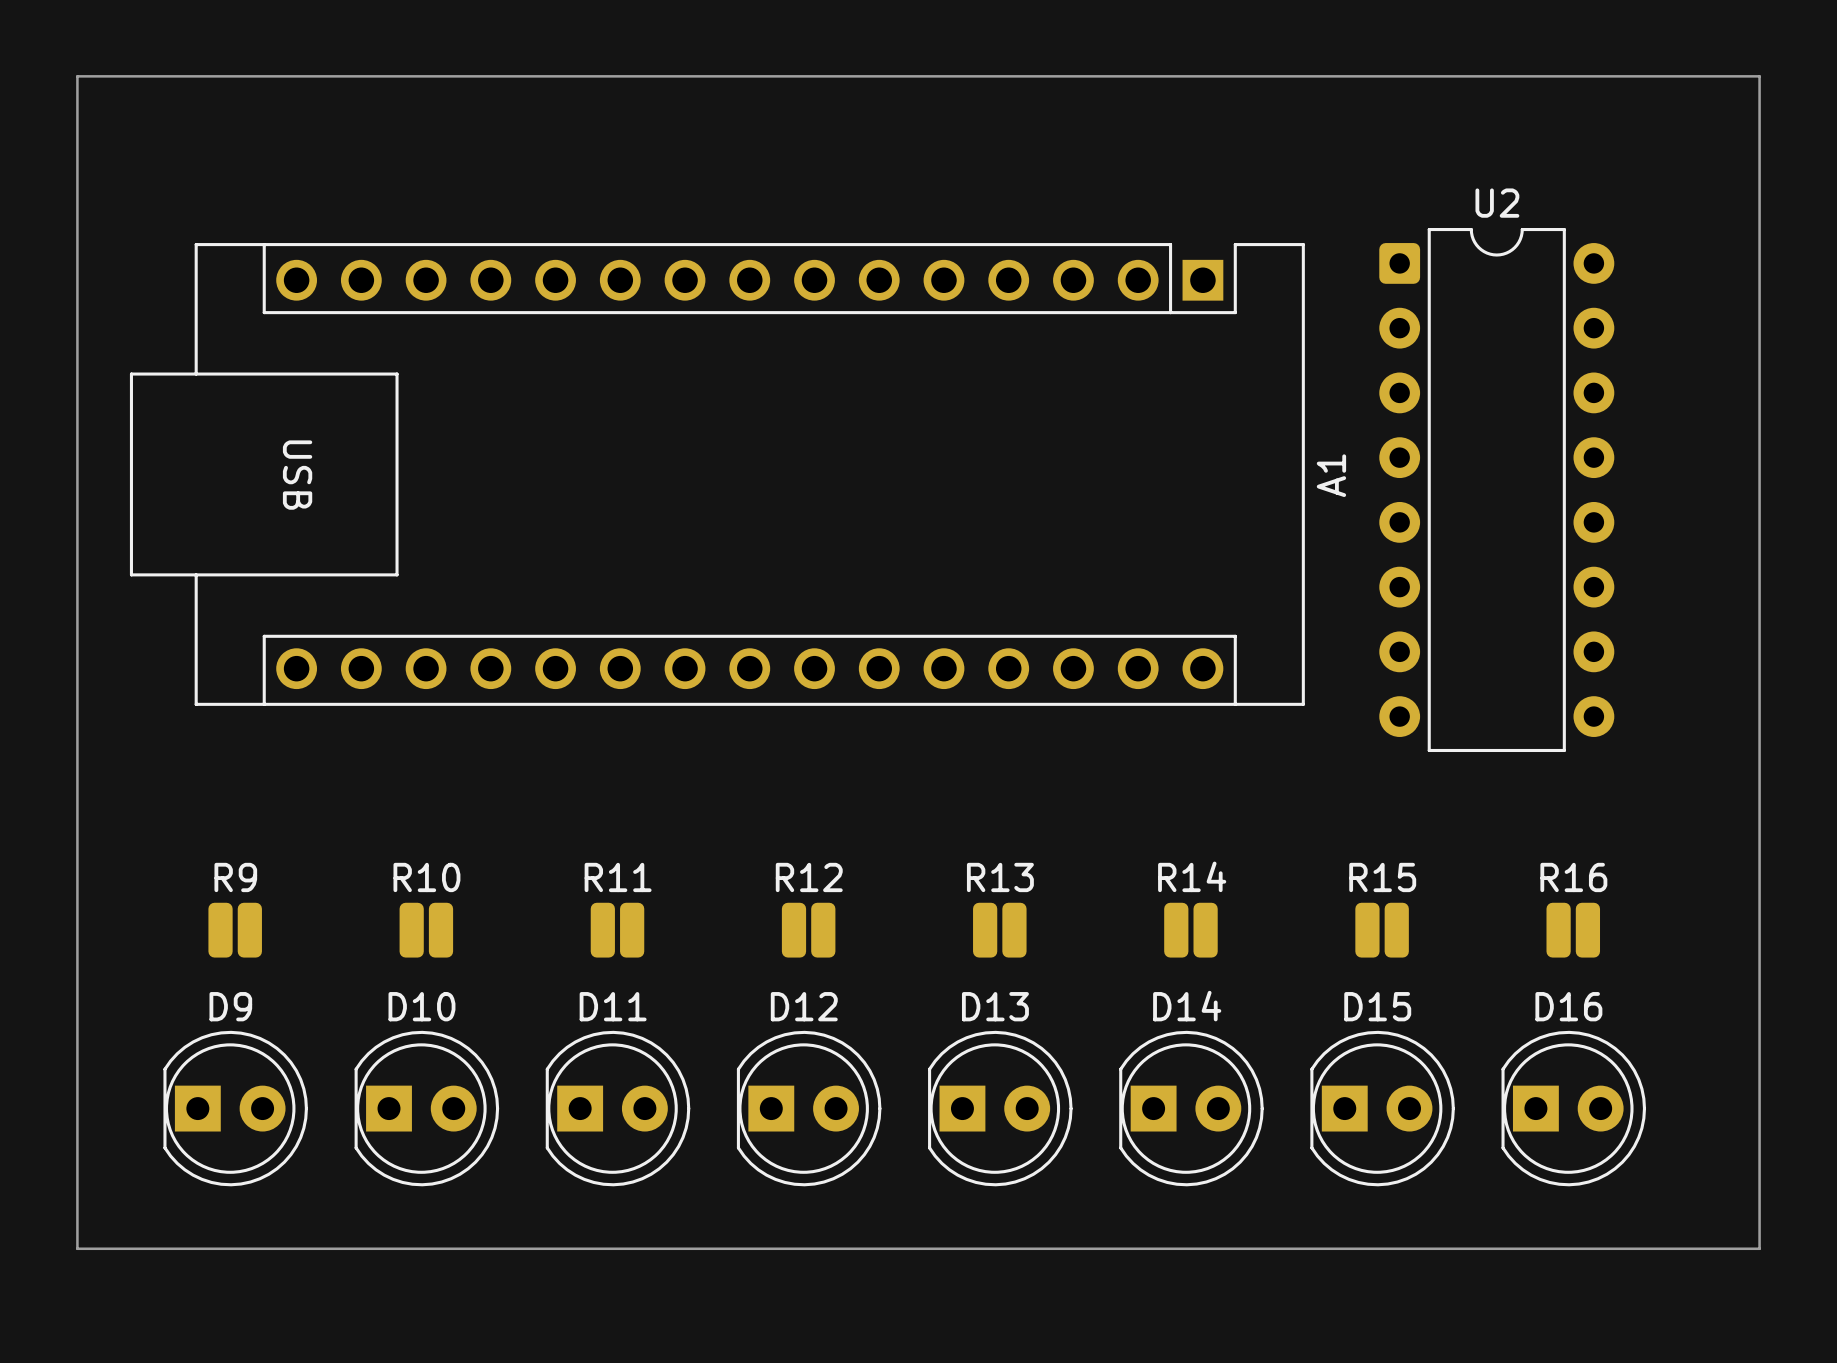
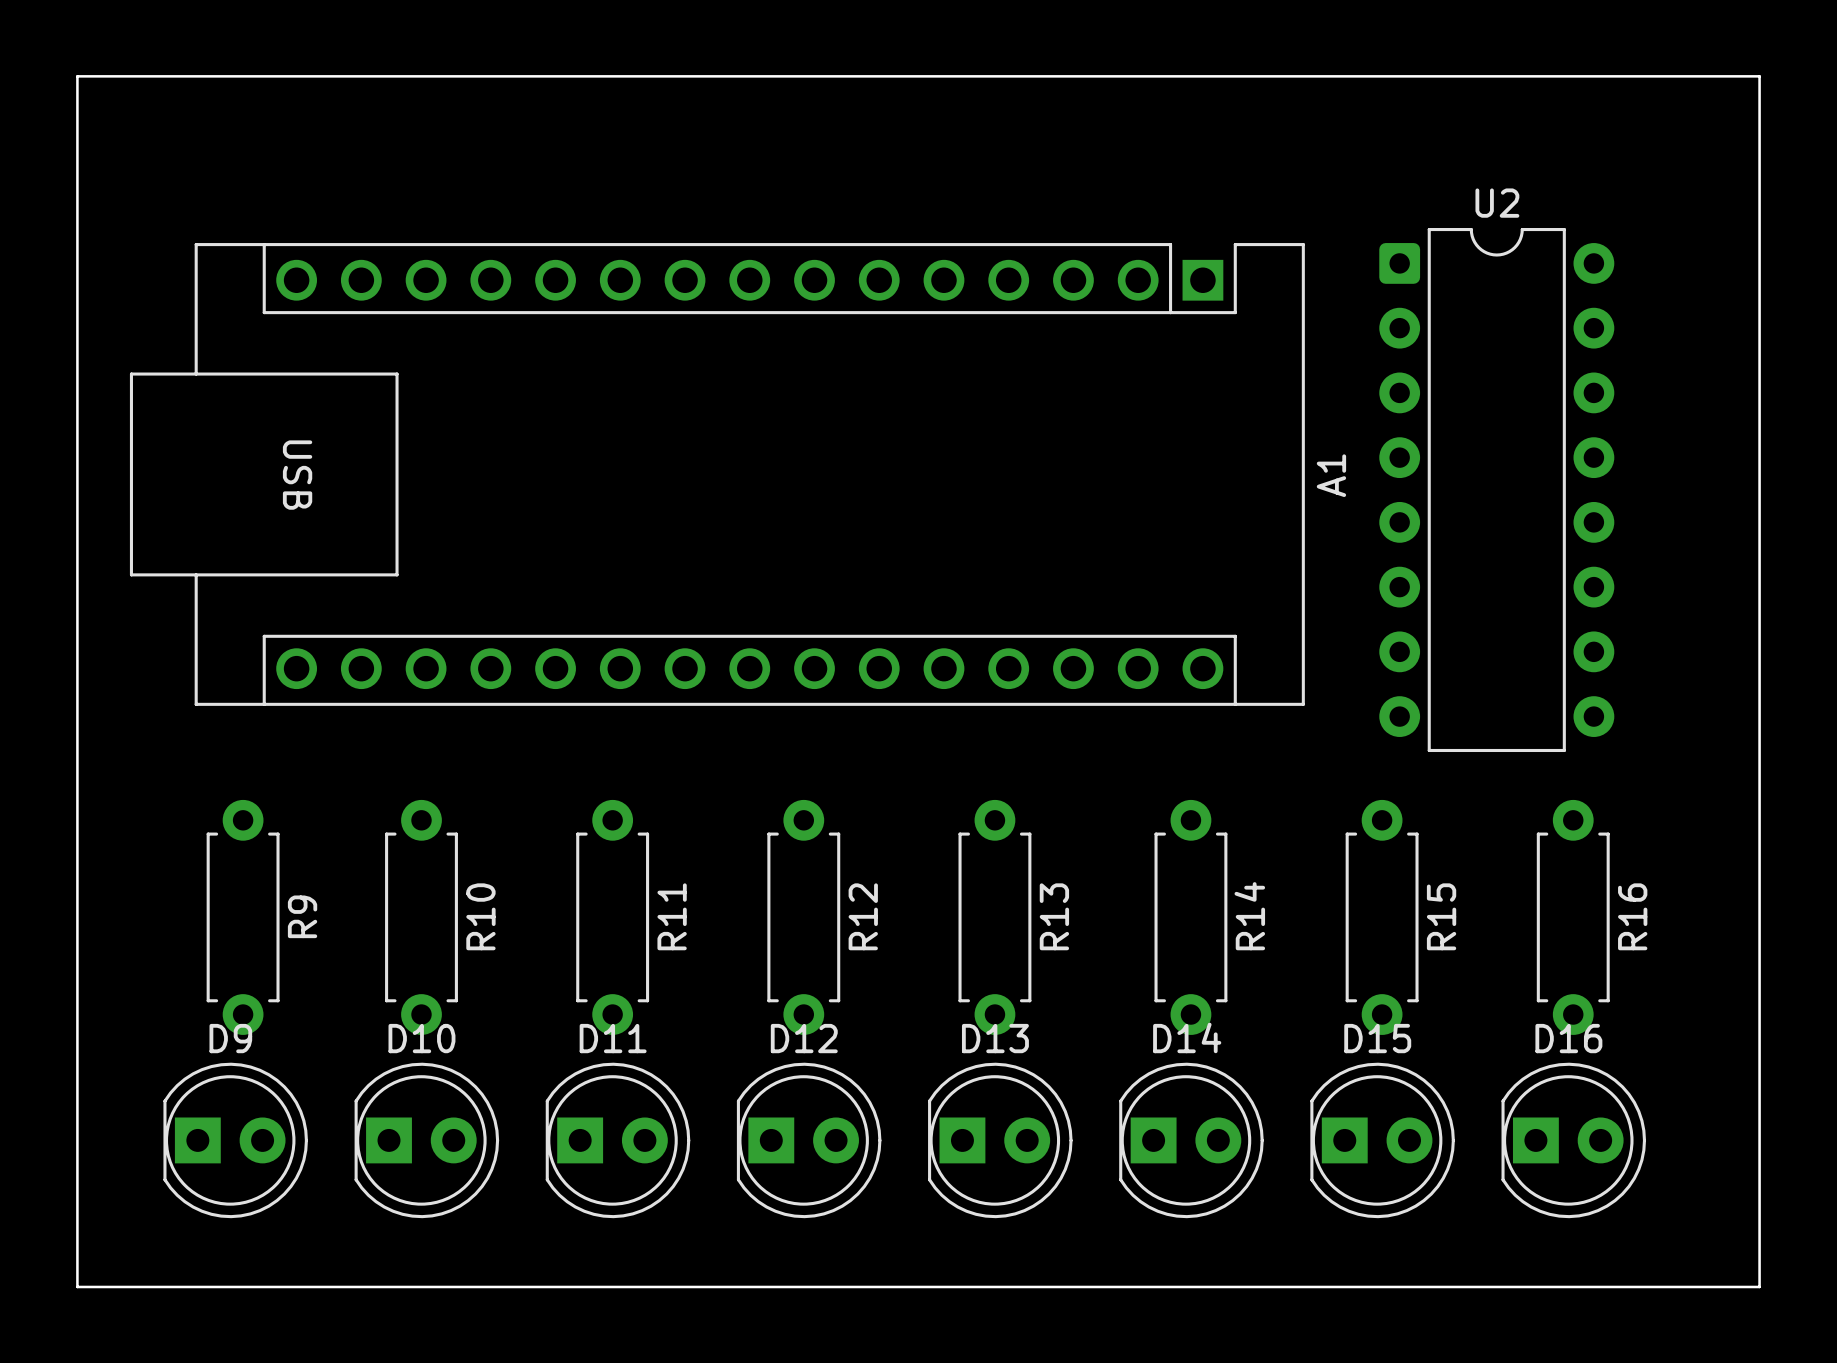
R14 name position: R14 (1192, 876) -> R14 (1249, 916)
R9 name position: R9 (235, 877) -> R9 (302, 916)
R10 name position: R10 (426, 877) -> R10 (480, 916)
R11 name position: R11 (618, 877) -> R11 (672, 916)
R12 name position: R12 (809, 877) -> R12 (863, 916)
R13 name position: R13 (1000, 877) -> R13 (1054, 916)
R15 name position: R15 (1382, 877) -> R15 (1441, 916)
R16 name position: R16 (1573, 877) -> R16 (1632, 916)
R9 footprint: [208, 902, 262, 958] -> [206, 799, 280, 1035]
R10 footprint: [399, 902, 454, 958] -> [385, 799, 458, 1035]
R11 footprint: [590, 902, 645, 958] -> [576, 799, 650, 1035]
R12 footprint: [781, 902, 836, 958] -> [767, 799, 841, 1035]
R13 footprint: [973, 902, 1027, 958] -> [958, 799, 1032, 1035]
R14 footprint: [1164, 902, 1218, 958] -> [1154, 799, 1228, 1035]
R15 footprint: [1355, 902, 1409, 958] -> [1345, 799, 1419, 1035]
R16 footprint: [1546, 902, 1601, 958] -> [1536, 799, 1610, 1035]
D9 position: (235, 1108) -> (235, 1140)
D10 position: (426, 1108) -> (426, 1140)
D11 position: (618, 1108) -> (618, 1140)
D12 position: (809, 1108) -> (809, 1140)
D13 position: (1000, 1108) -> (1000, 1140)
D14 position: (1191, 1108) -> (1191, 1140)
D15 position: (1382, 1108) -> (1382, 1140)
D16 position: (1573, 1108) -> (1573, 1140)
board edge: (77, 1248) (1759, 1248) -> (77, 1248) (77, 1286) (1759, 1286) (1759, 1248)

